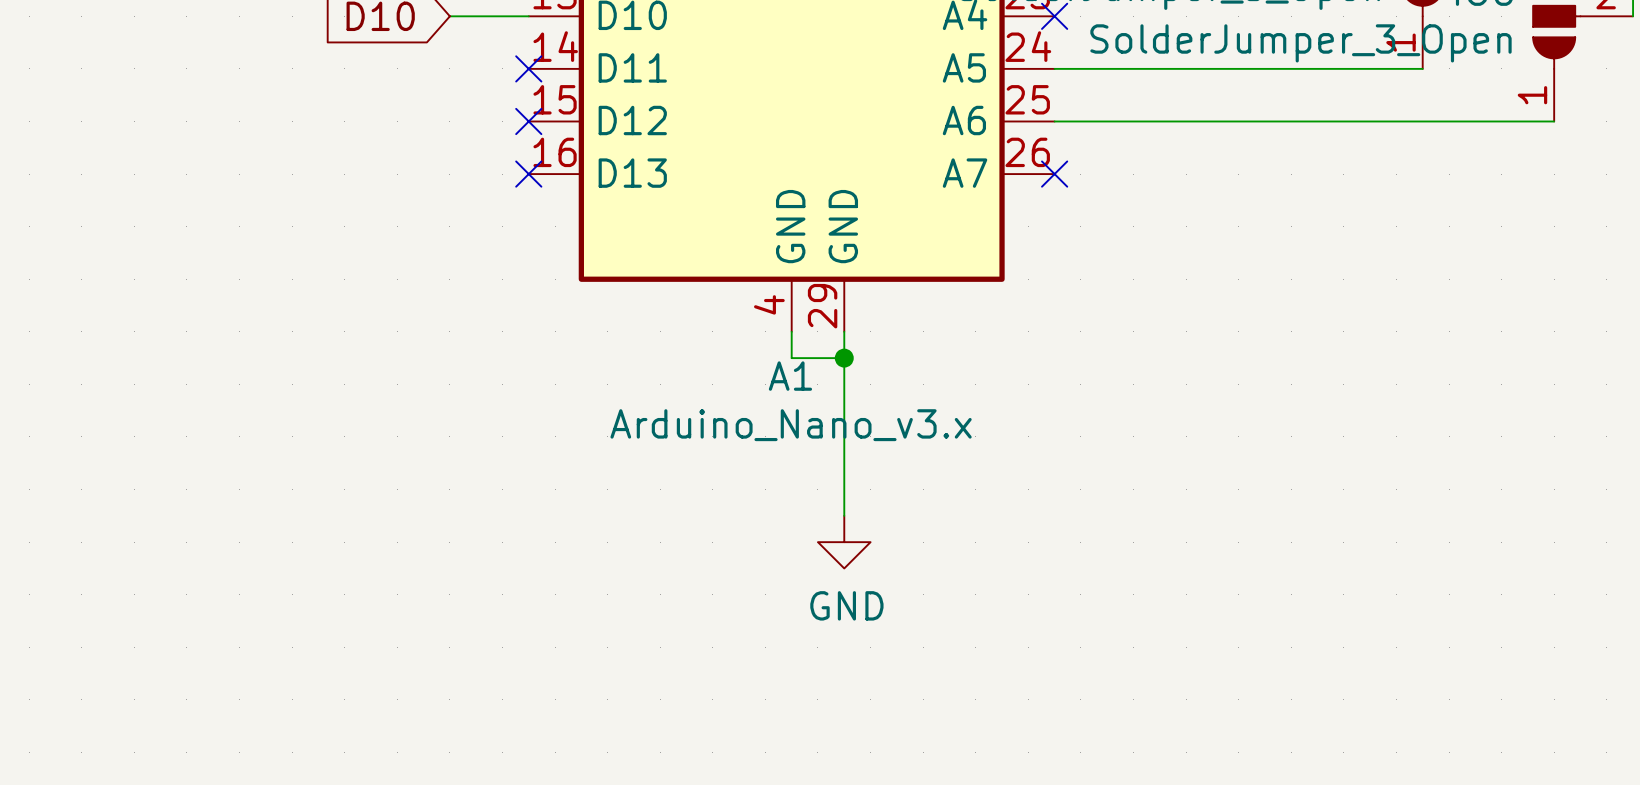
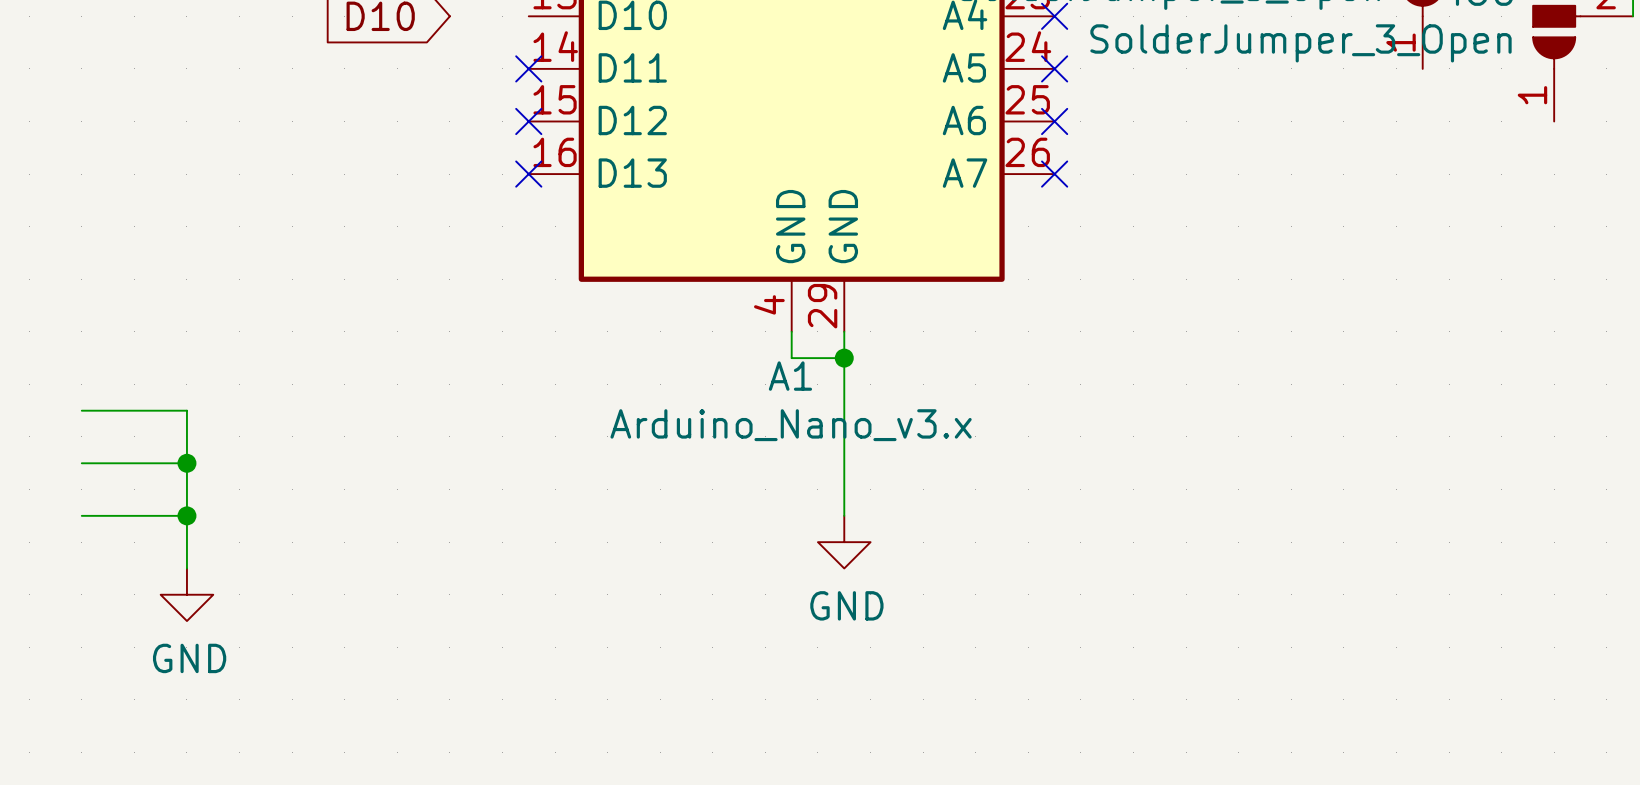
wire: (449, 16) (528, 16) -> none
wire: (1054, 68) (1422, 68) -> none
no-connect mark: none -> (1054, 68)
wire: (1054, 121) (1554, 121) -> none
no-connect mark: none -> (1054, 121)
wire: none -> (81, 410) (186, 410) (186, 568)
wire: none -> (81, 463) (186, 463)
junction: none -> (186, 463)
wire: none -> (81, 515) (186, 515)
junction: none -> (186, 515)
power symbol: none -> GND (186, 594)

